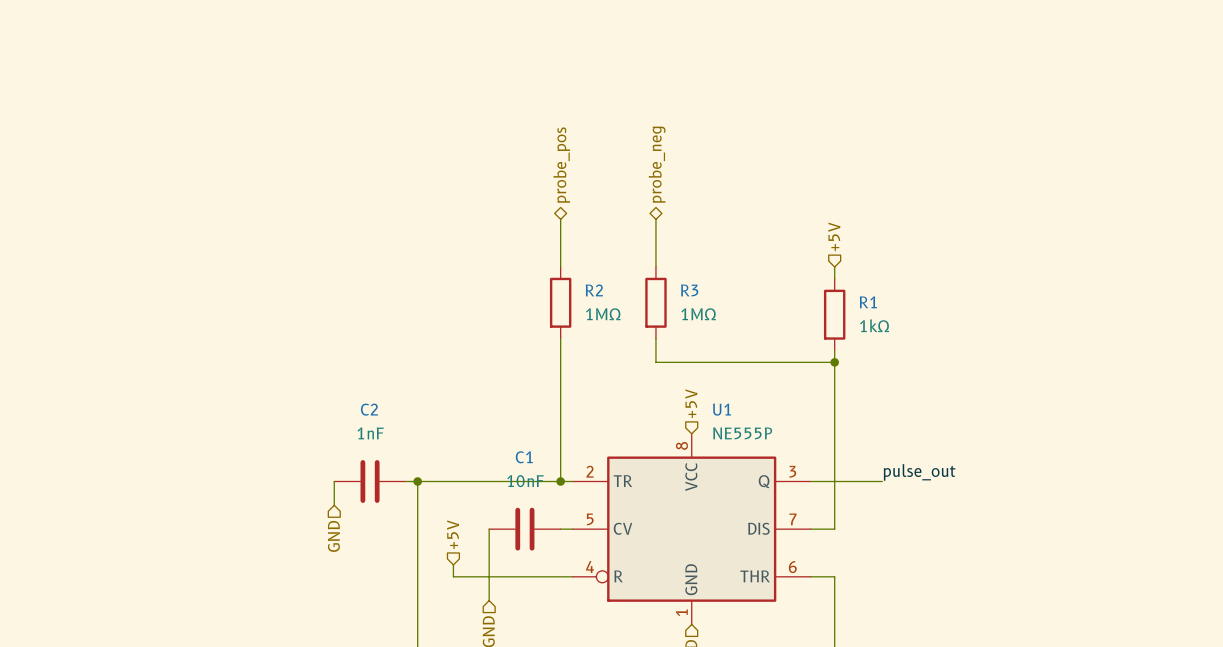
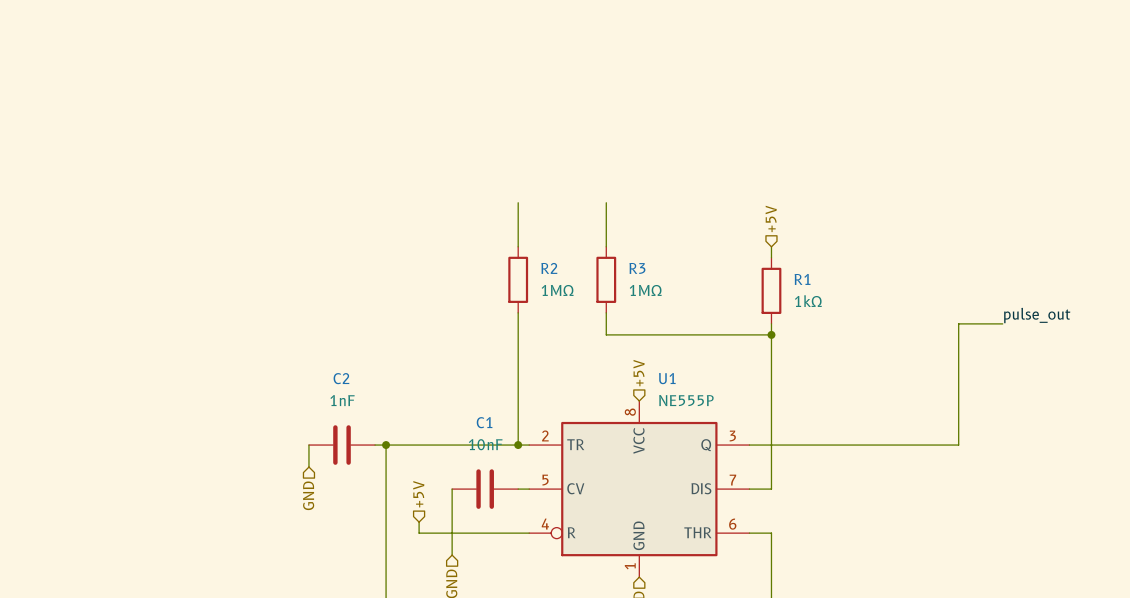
hierarchical label: probe_neg (657, 164) -> none
hierarchical label: probe_pos (561, 165) -> none
label: none -> pulse_out (1037, 315)
wire: none -> (1002, 323) (958, 323) (958, 445) (815, 445)
label: pulse_out (919, 472) -> none

